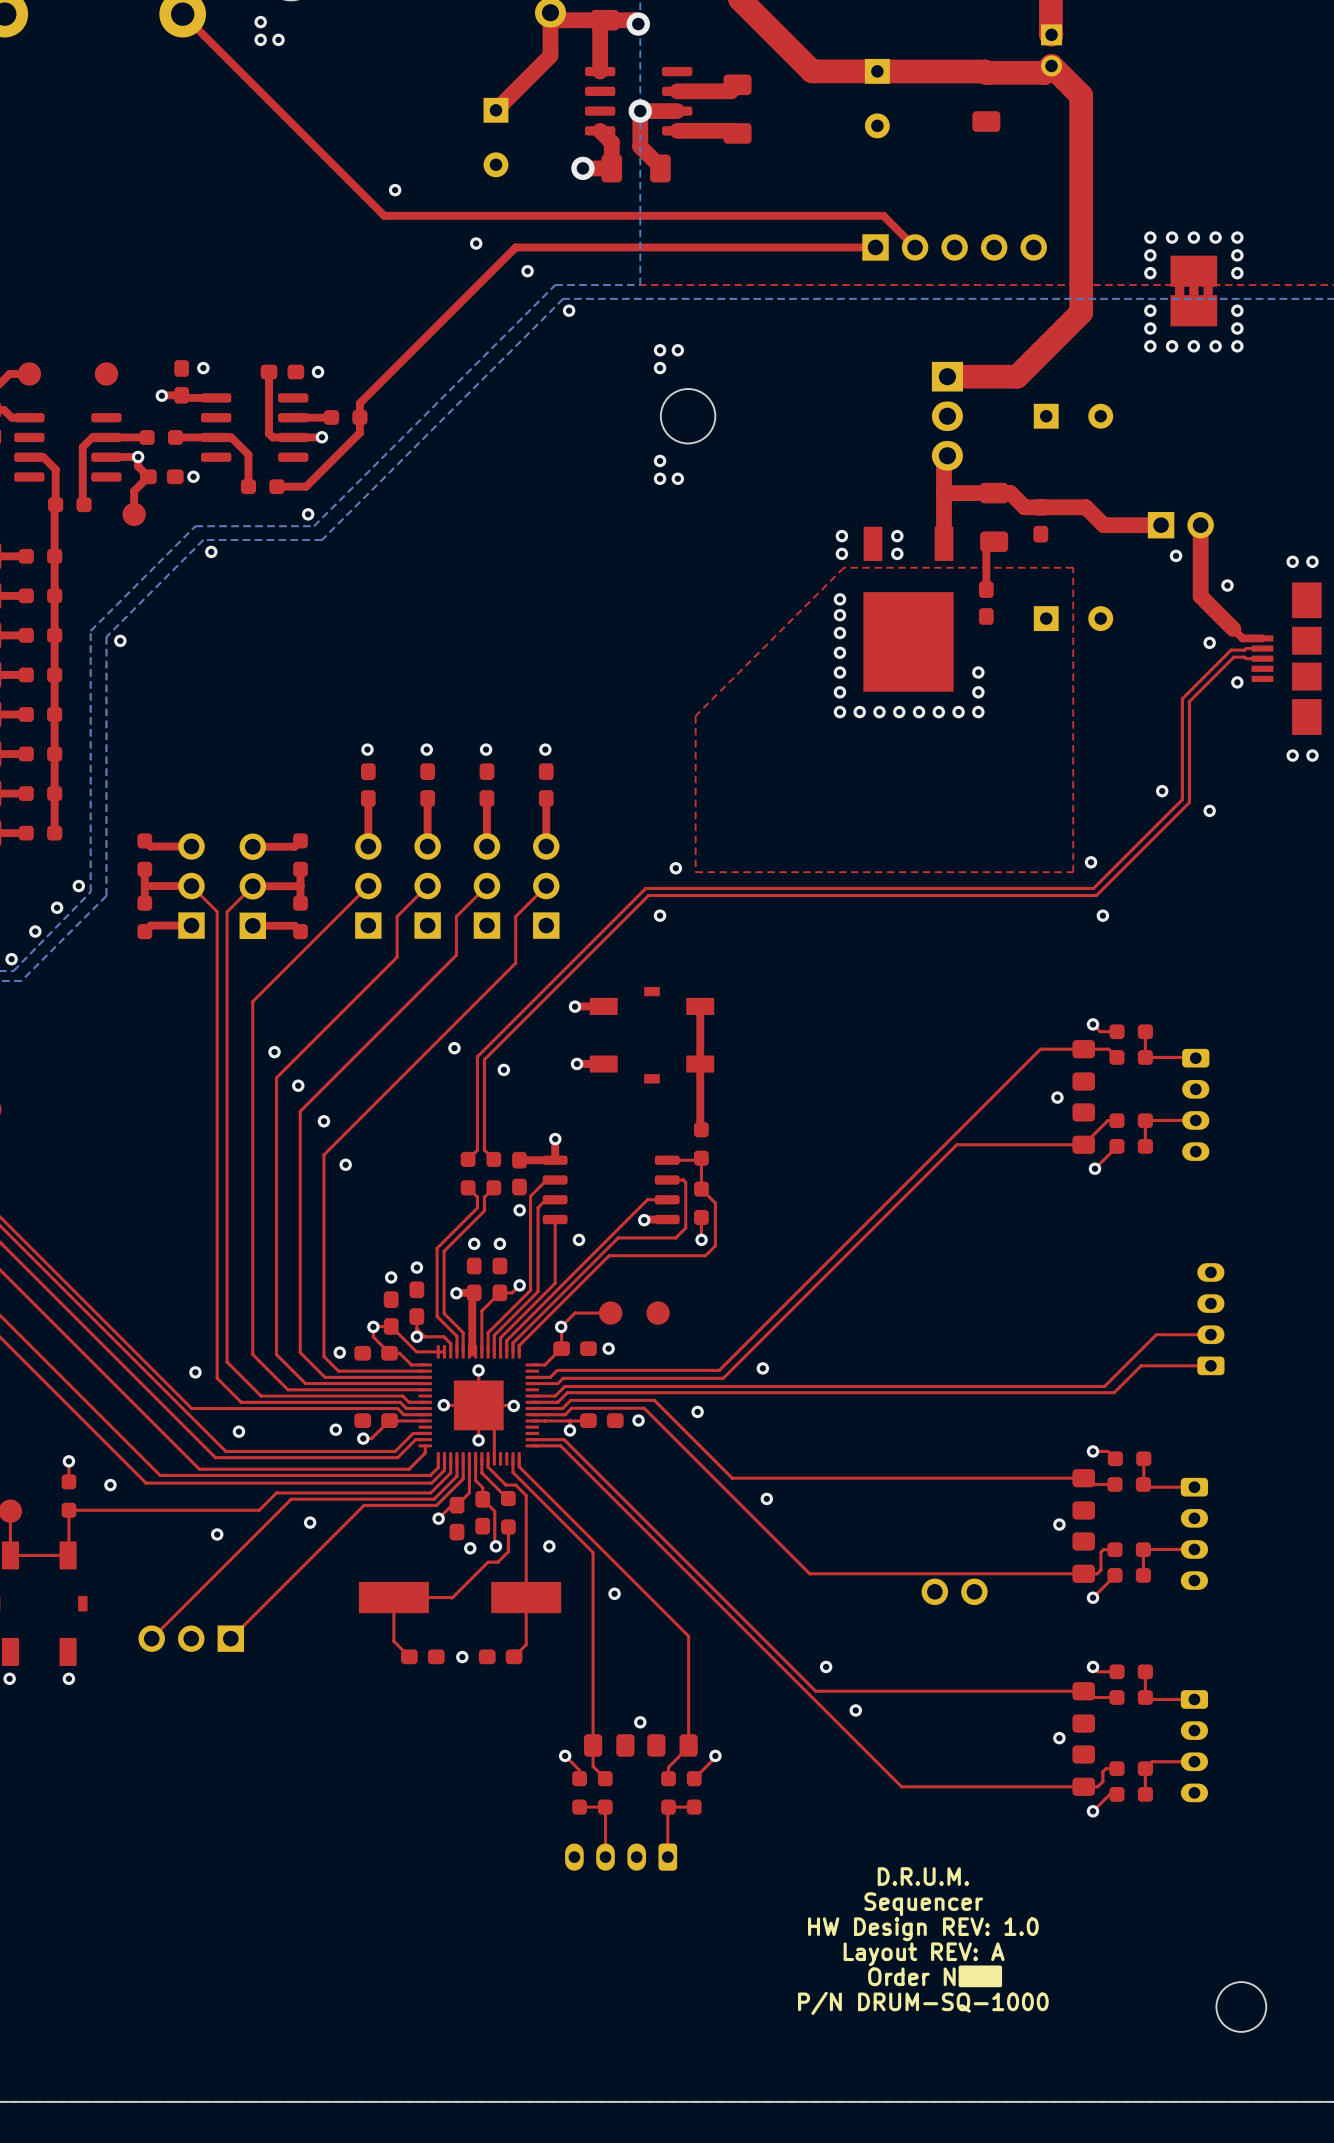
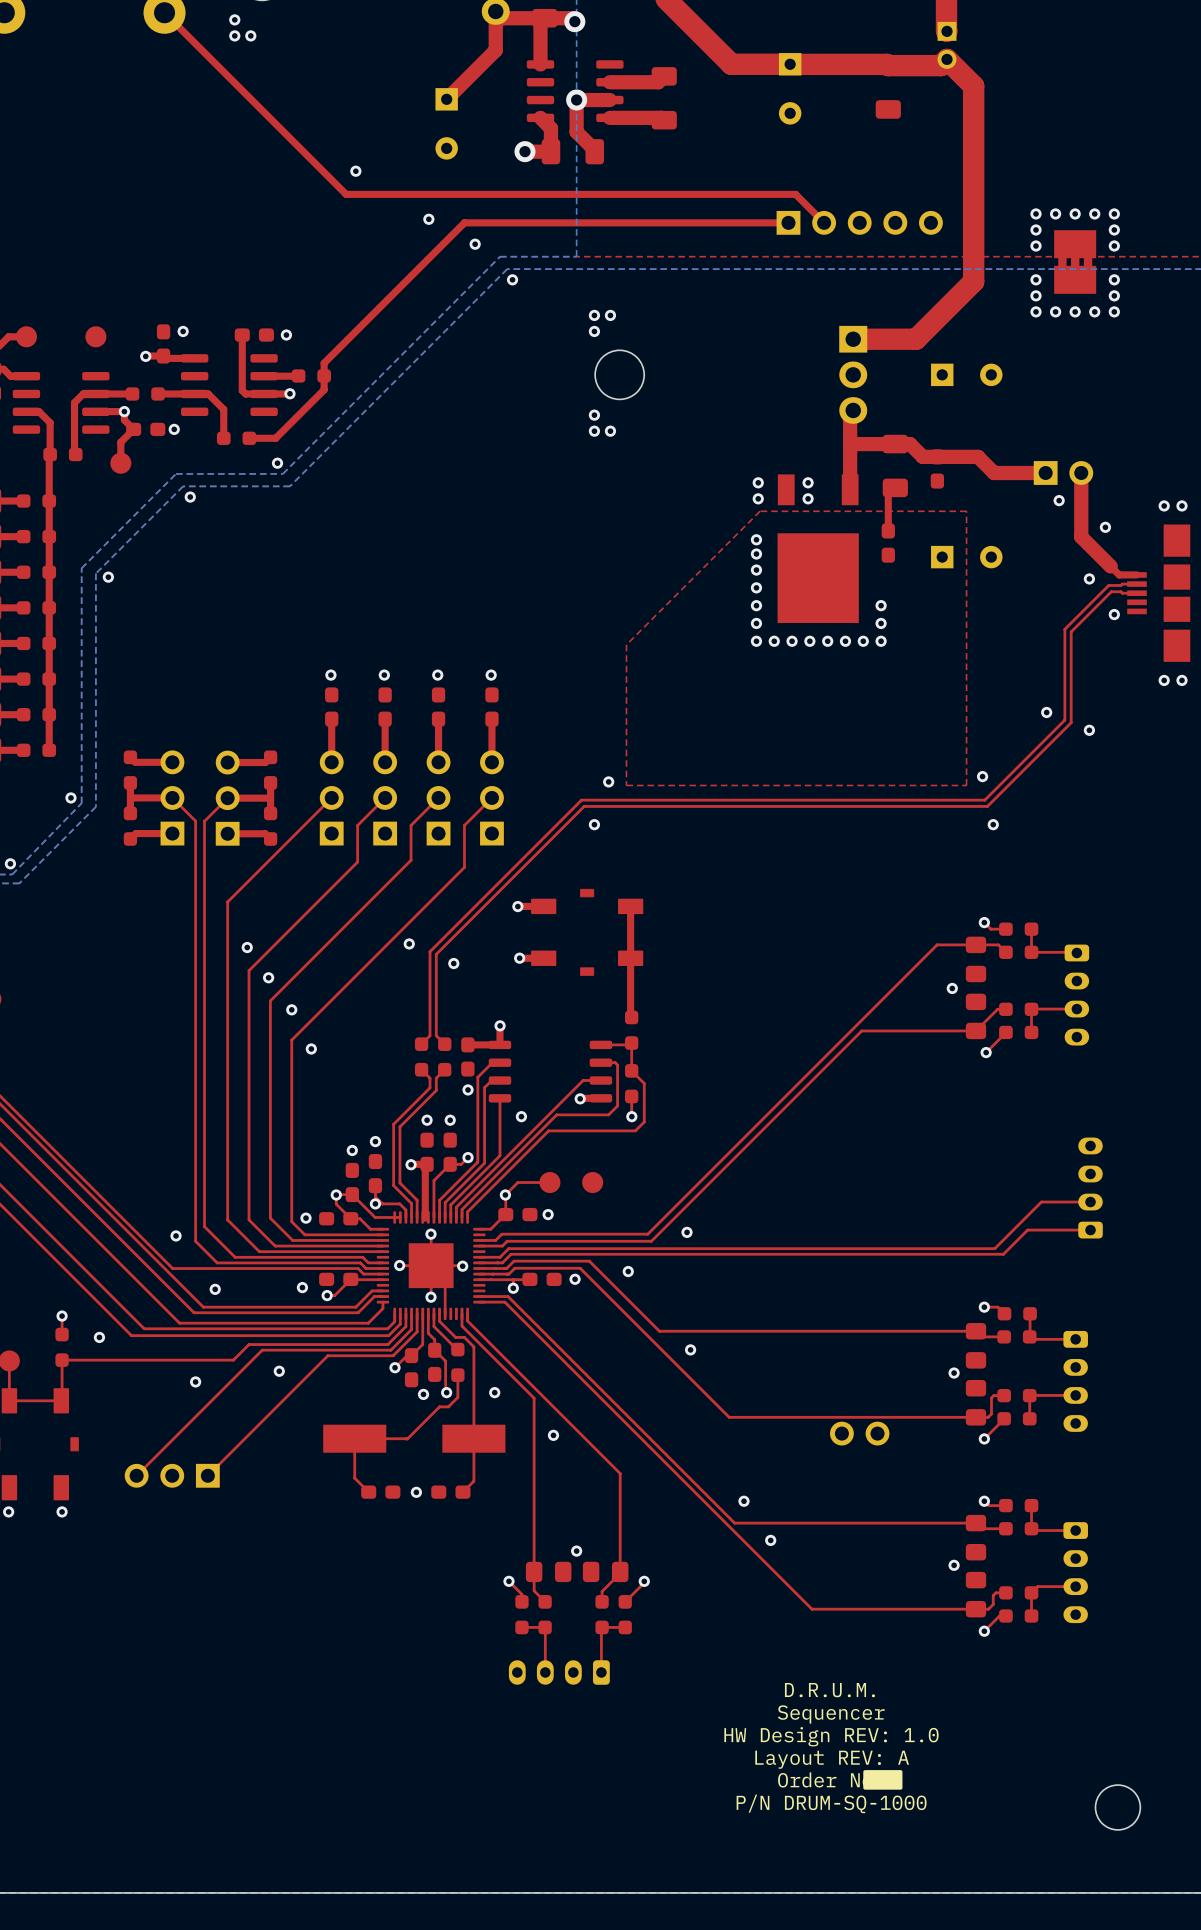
via: (57, 907) -> none
via: (35, 931) -> none

